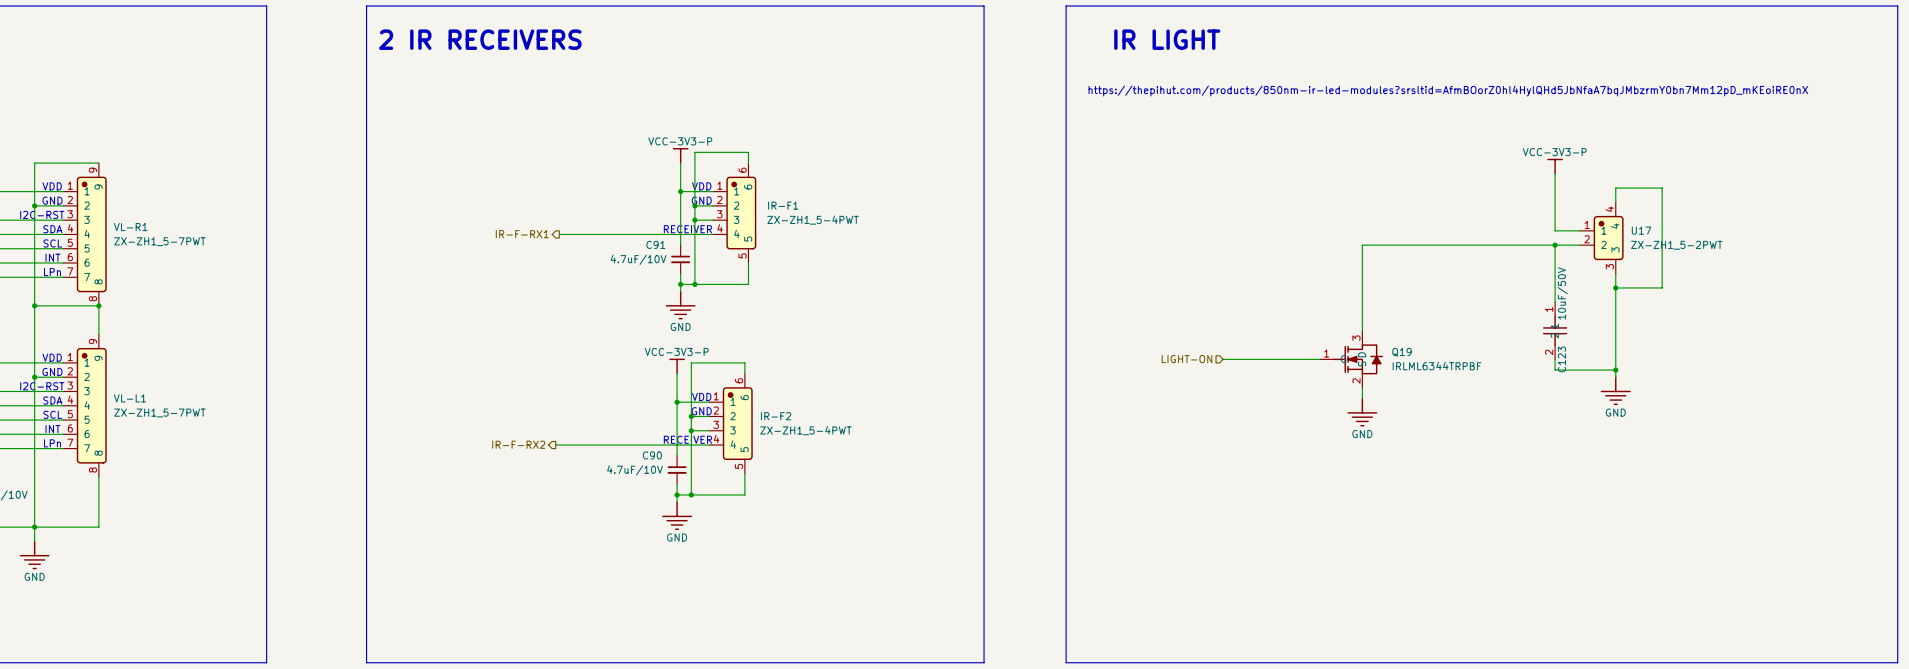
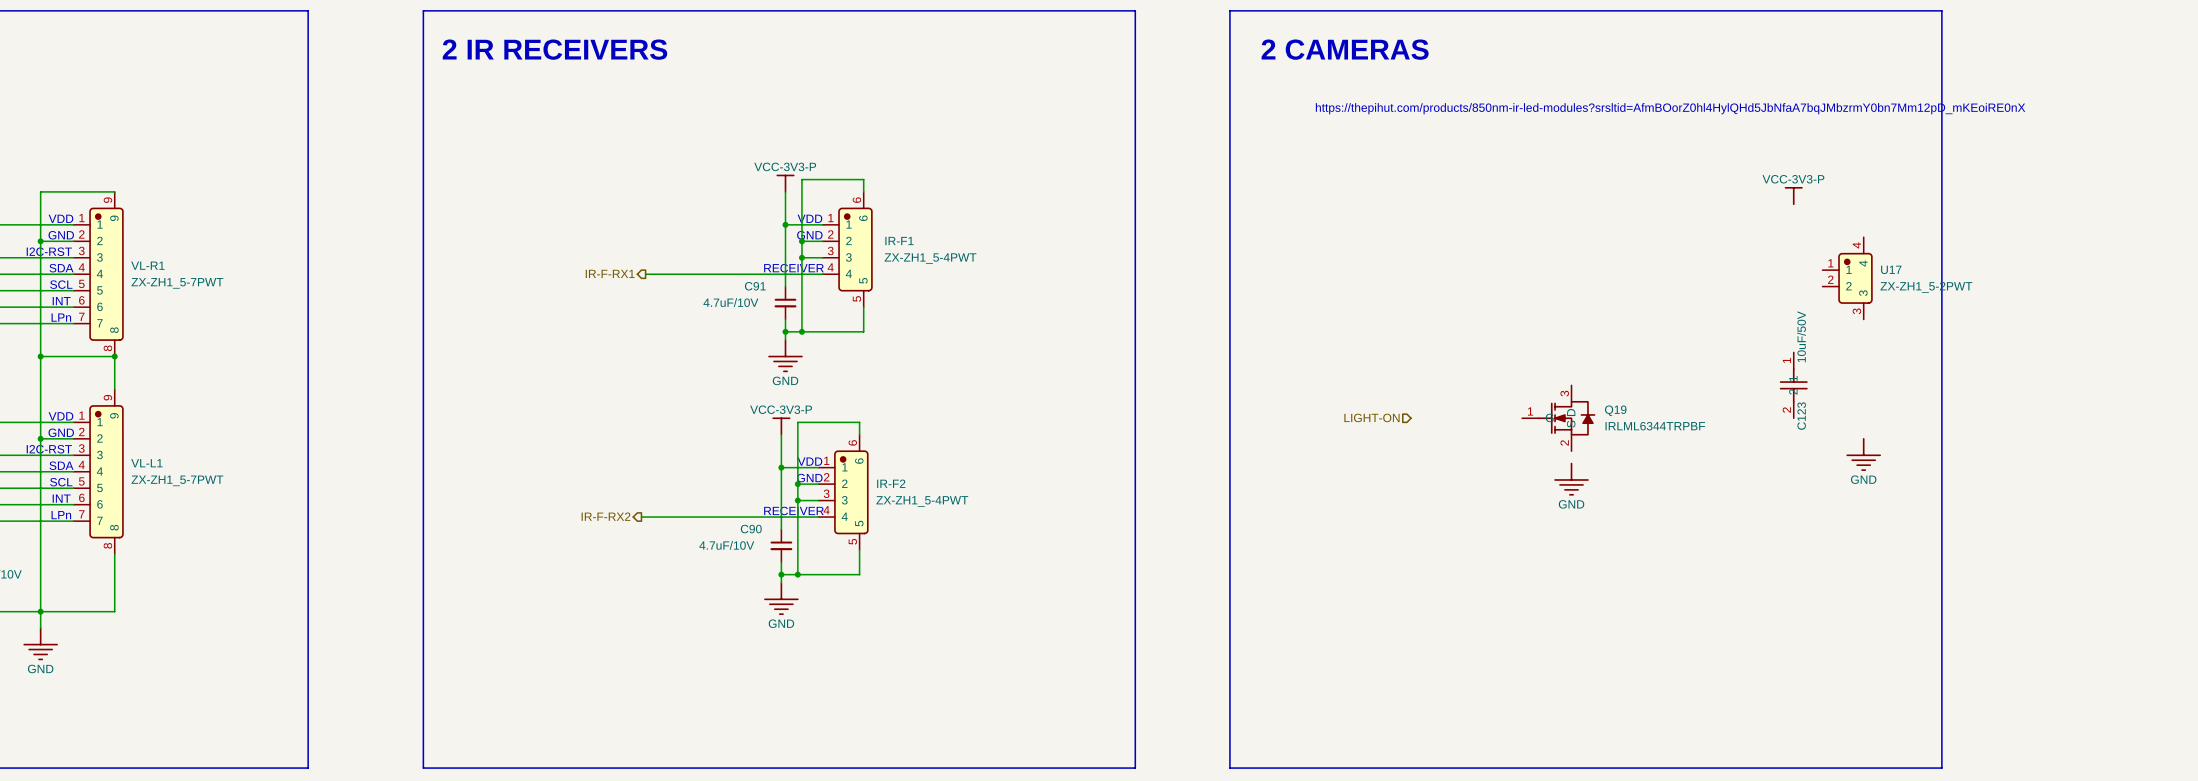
line: (1683, 6) (1897, 6) (1897, 662) (1683, 662) -> (1941, 10) (1941, 768)
text: IR LIGHT (1167, 39) -> 2 CAMERAS (1345, 49)
wire: (1555, 173) (1555, 230) (1580, 230) -> none
wire: (1615, 202) (1615, 188) (1662, 188) (1662, 287) (1615, 287) -> none
wire: (1555, 245) (1555, 302) -> none
junction: (1555, 245) -> none
wire: (1580, 245) (1362, 245) (1362, 330) -> none
wire: (1615, 273) (1615, 377) -> none
junction: (1615, 287) -> none
wire: (1223, 359) (1319, 359) -> none
wire: (1555, 359) (1555, 370) (1615, 370) -> none
junction: (1615, 370) -> none
wire: (1362, 387) (1362, 398) -> none

